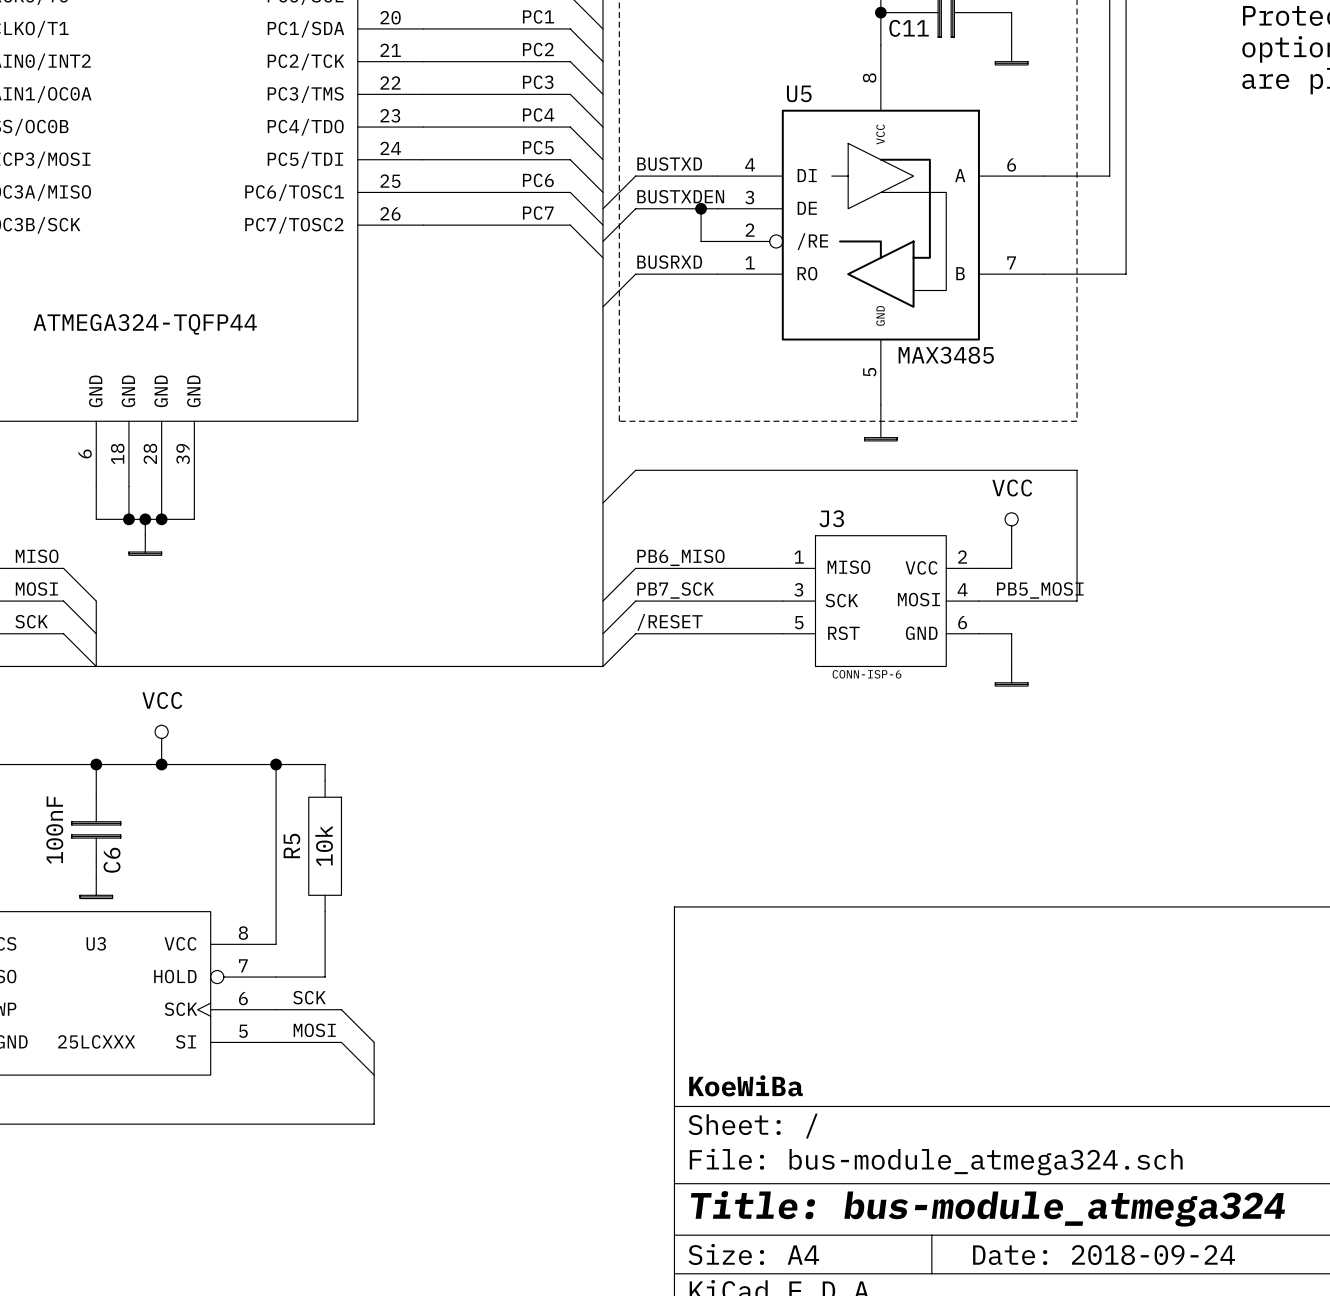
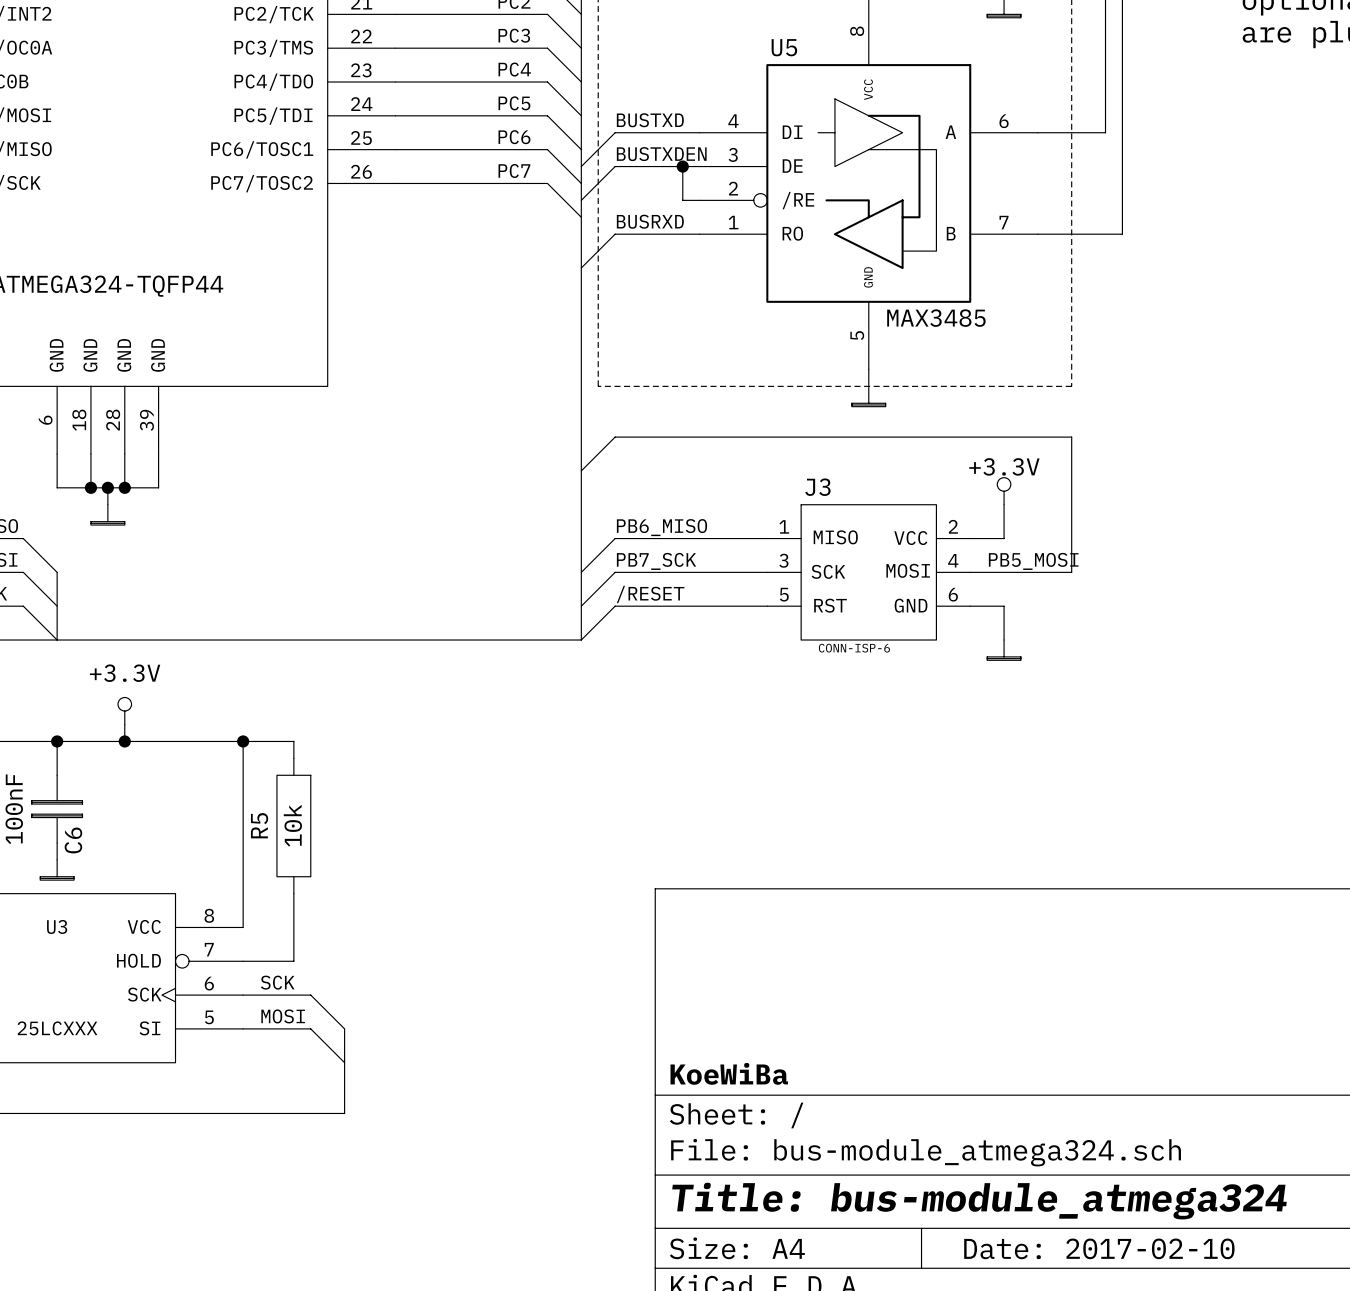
power symbol: VCC (1011, 524) -> +3.3V (1004, 491)
power symbol: VCC (161, 736) -> +3.3V (124, 711)
title block: Date: 2018-09-24 (1104, 1255) -> Date: 2017-02-10 (1099, 1248)

